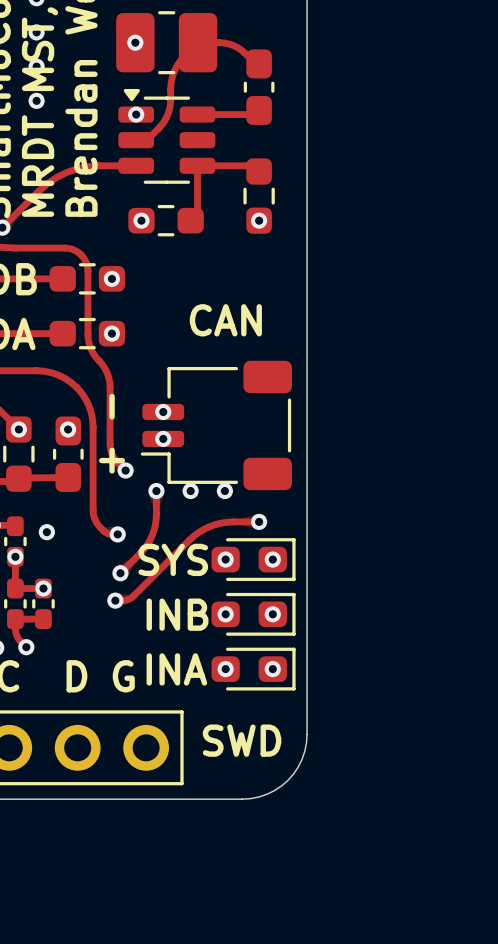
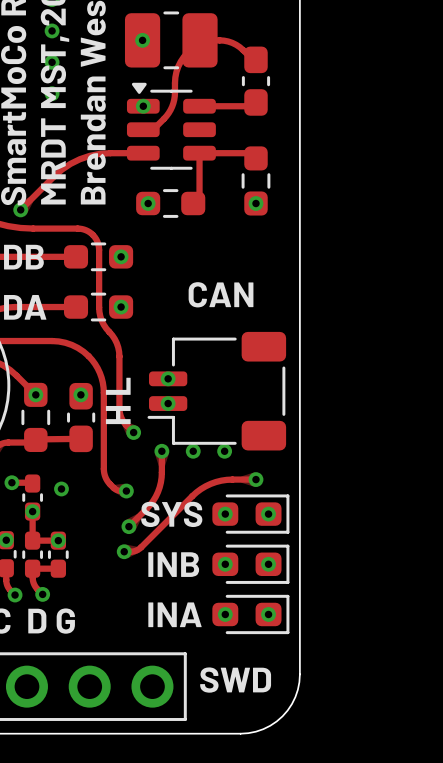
text: + - (112, 433) -> H L (118, 400)

